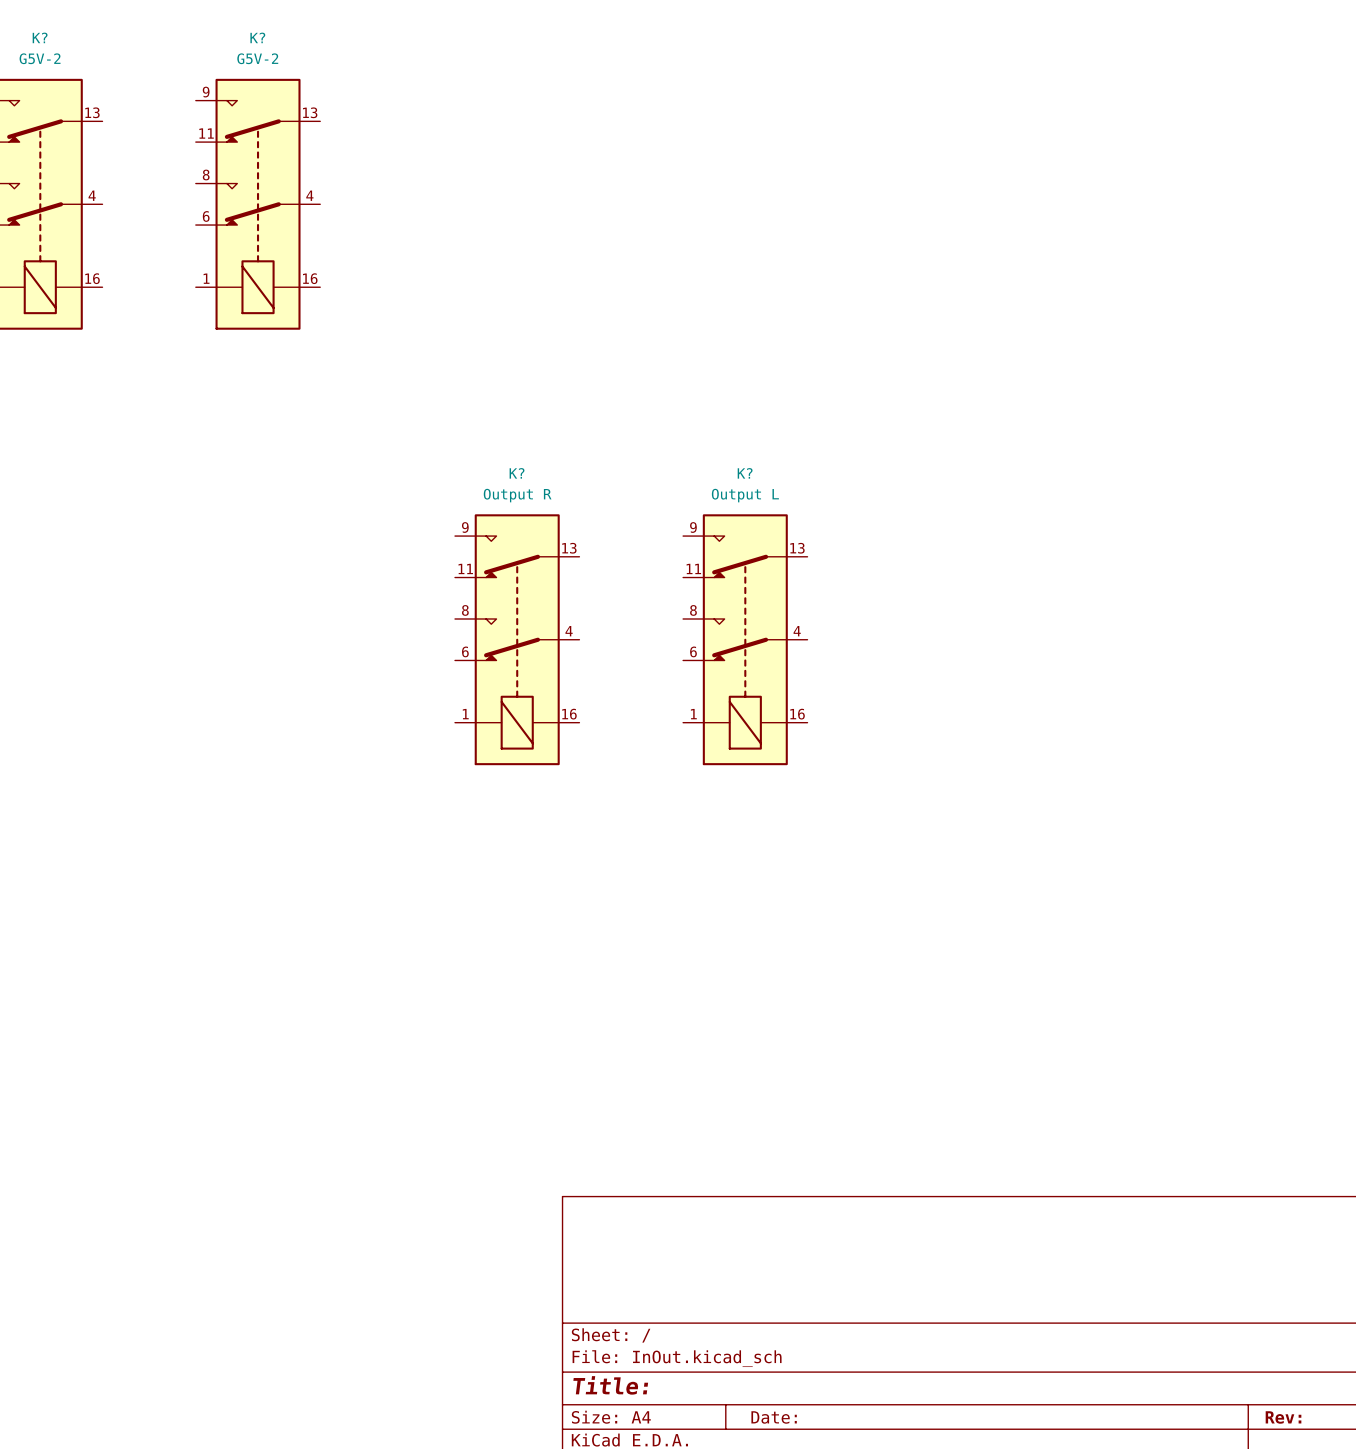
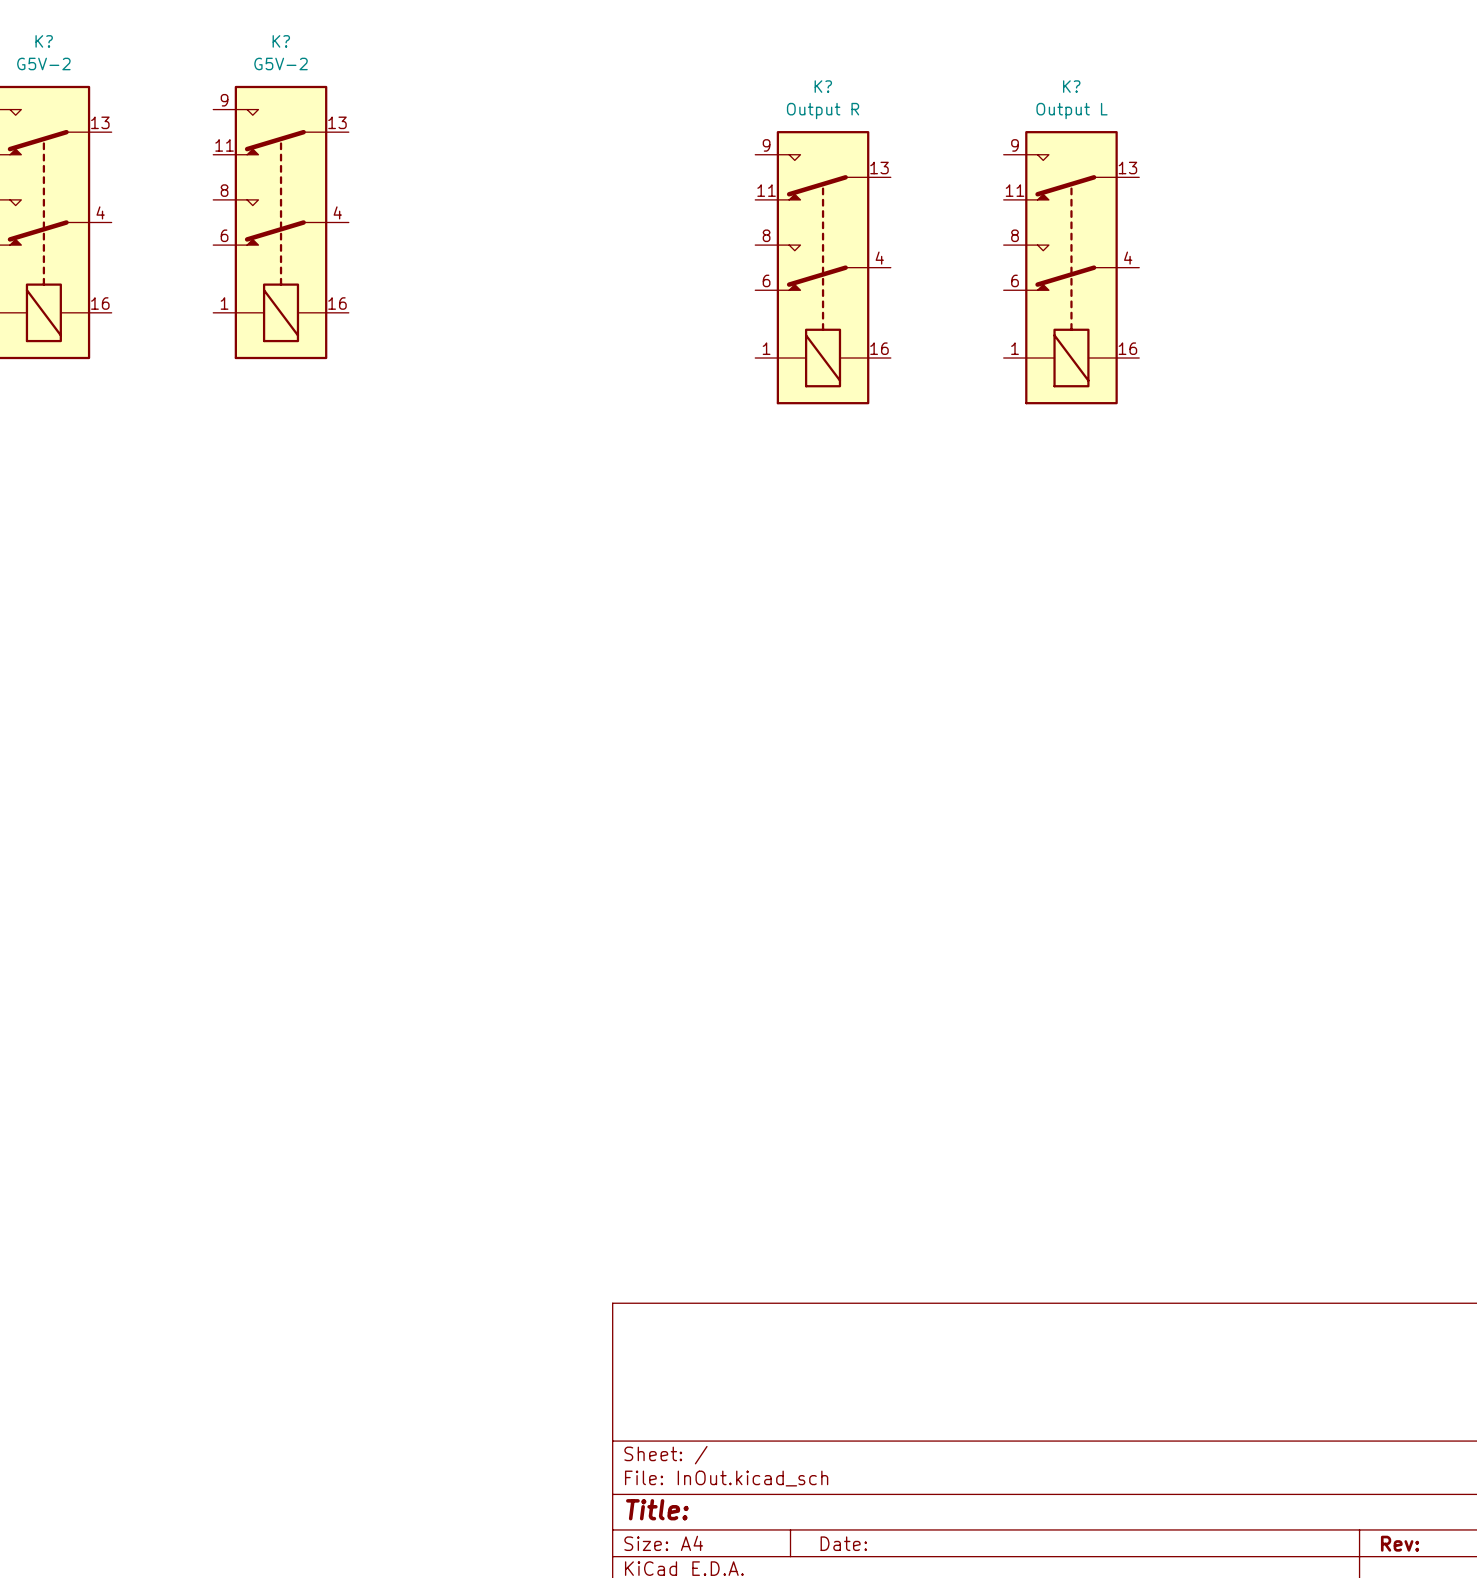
K?: none -> Output R (823, 267)
K?: none -> Output L (1071, 267)
K?: Output R (517, 639) -> none
K?: Output L (745, 639) -> none

